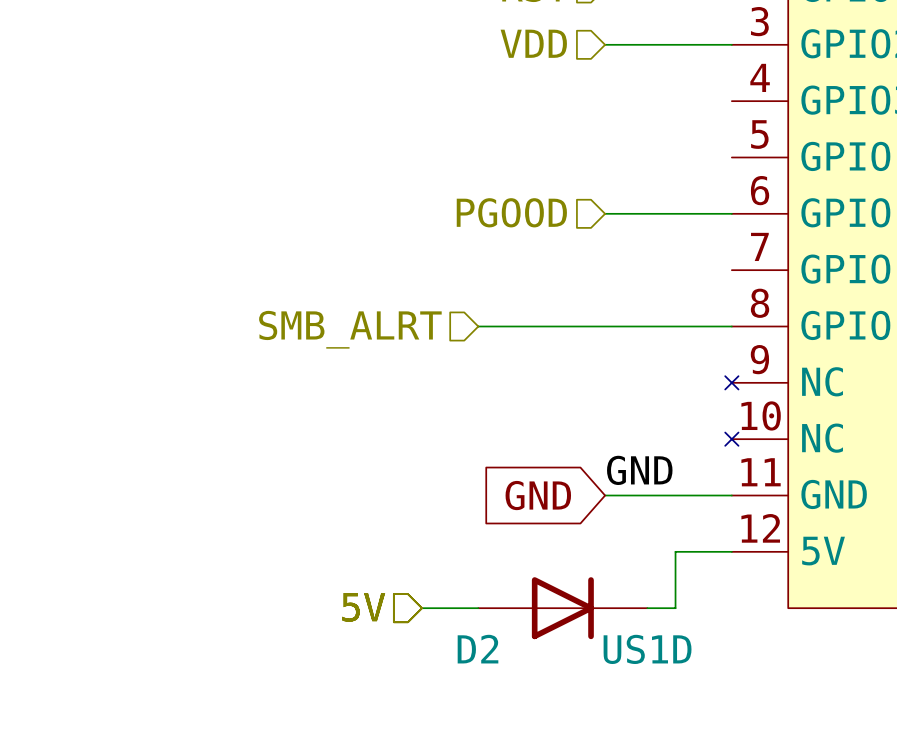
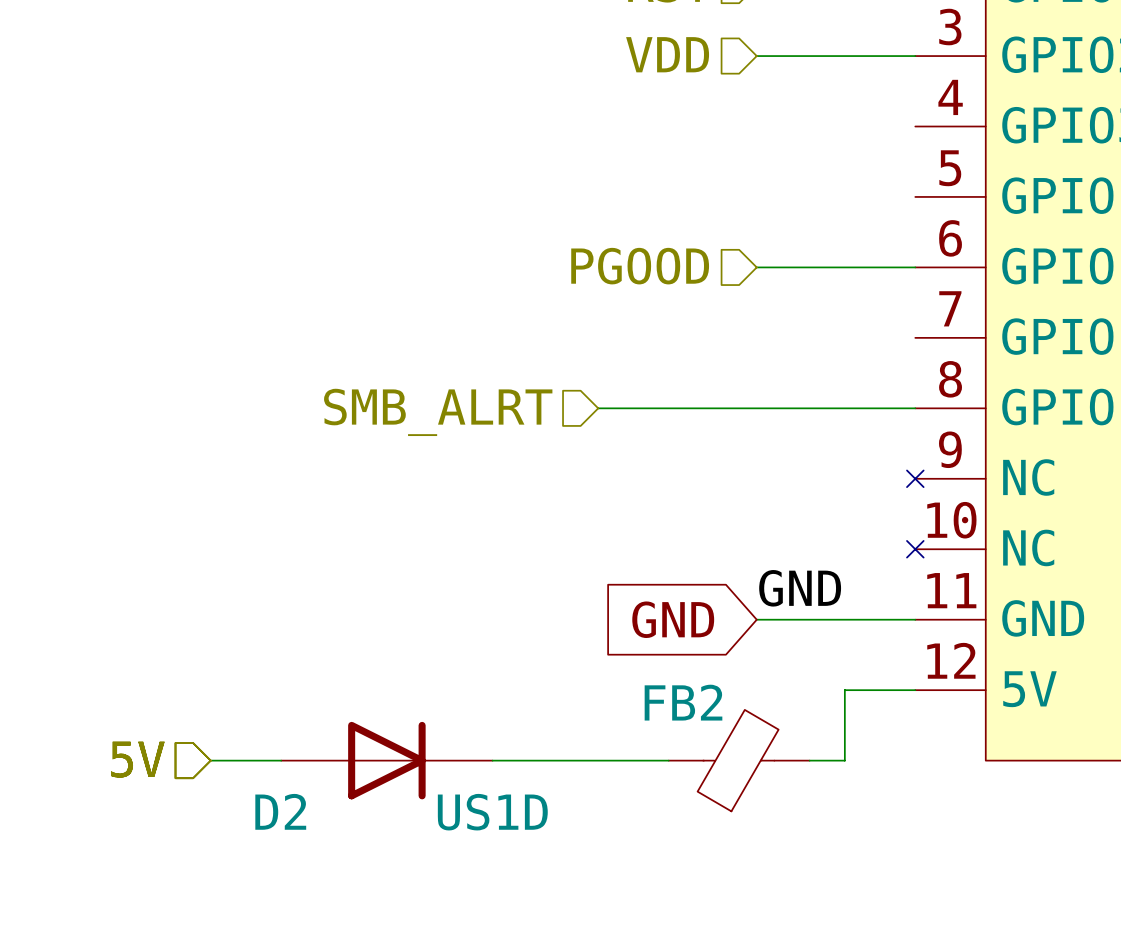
hierarchical label position: 5V (363, 607) -> 5V (137, 759)
wire: none -> (210, 760) (281, 760)
wire: none -> (492, 760) (527, 760)
D2 position: (562, 608) -> (386, 760)
FB2: none -> (739, 760)

